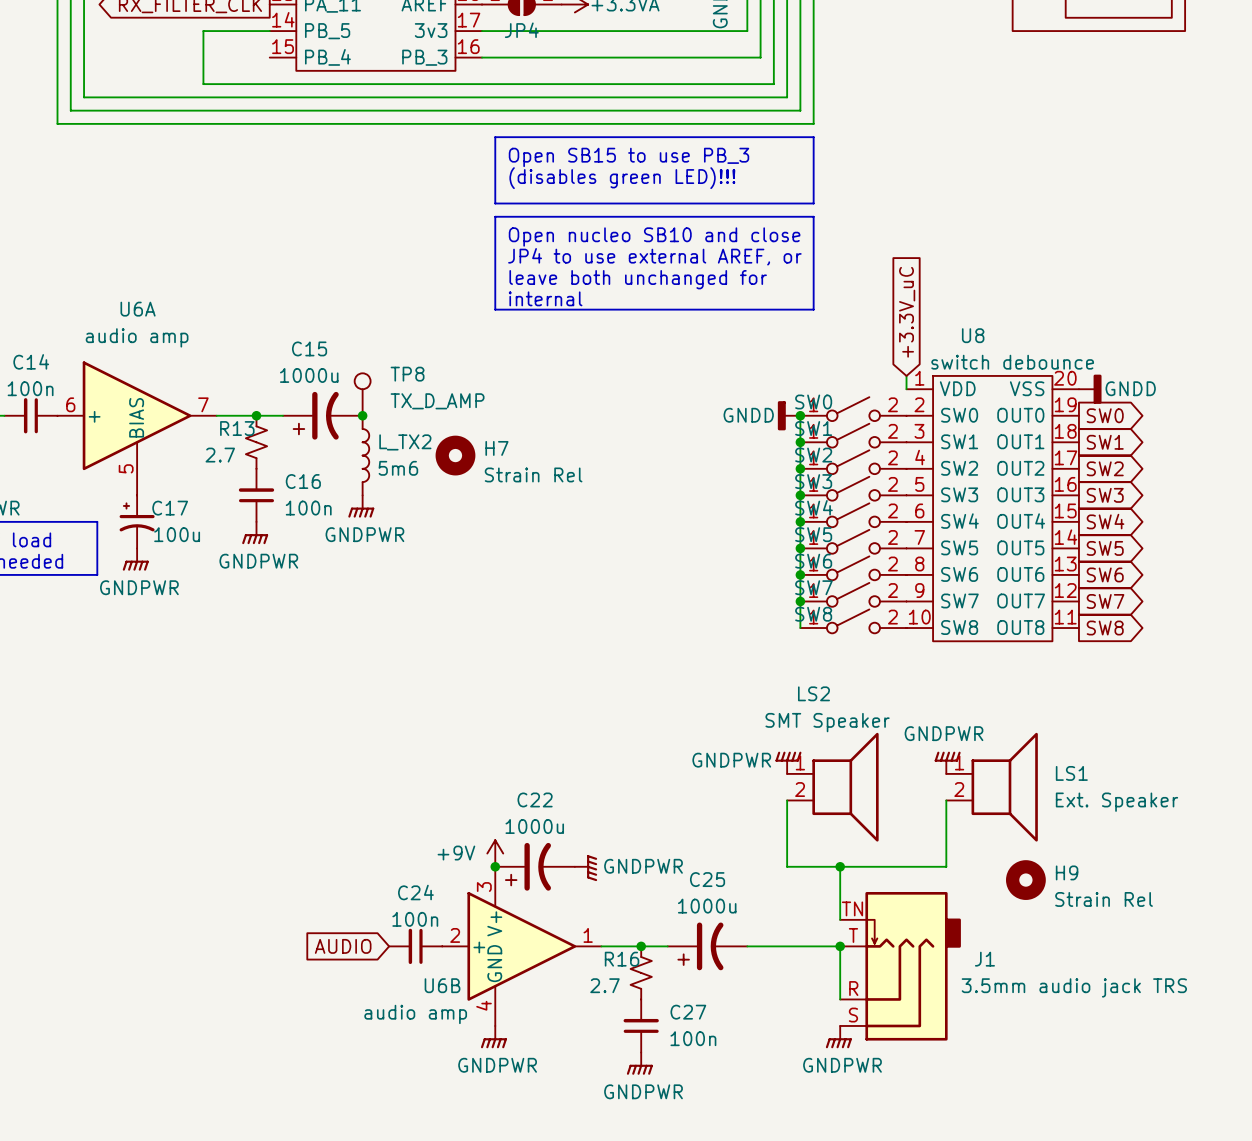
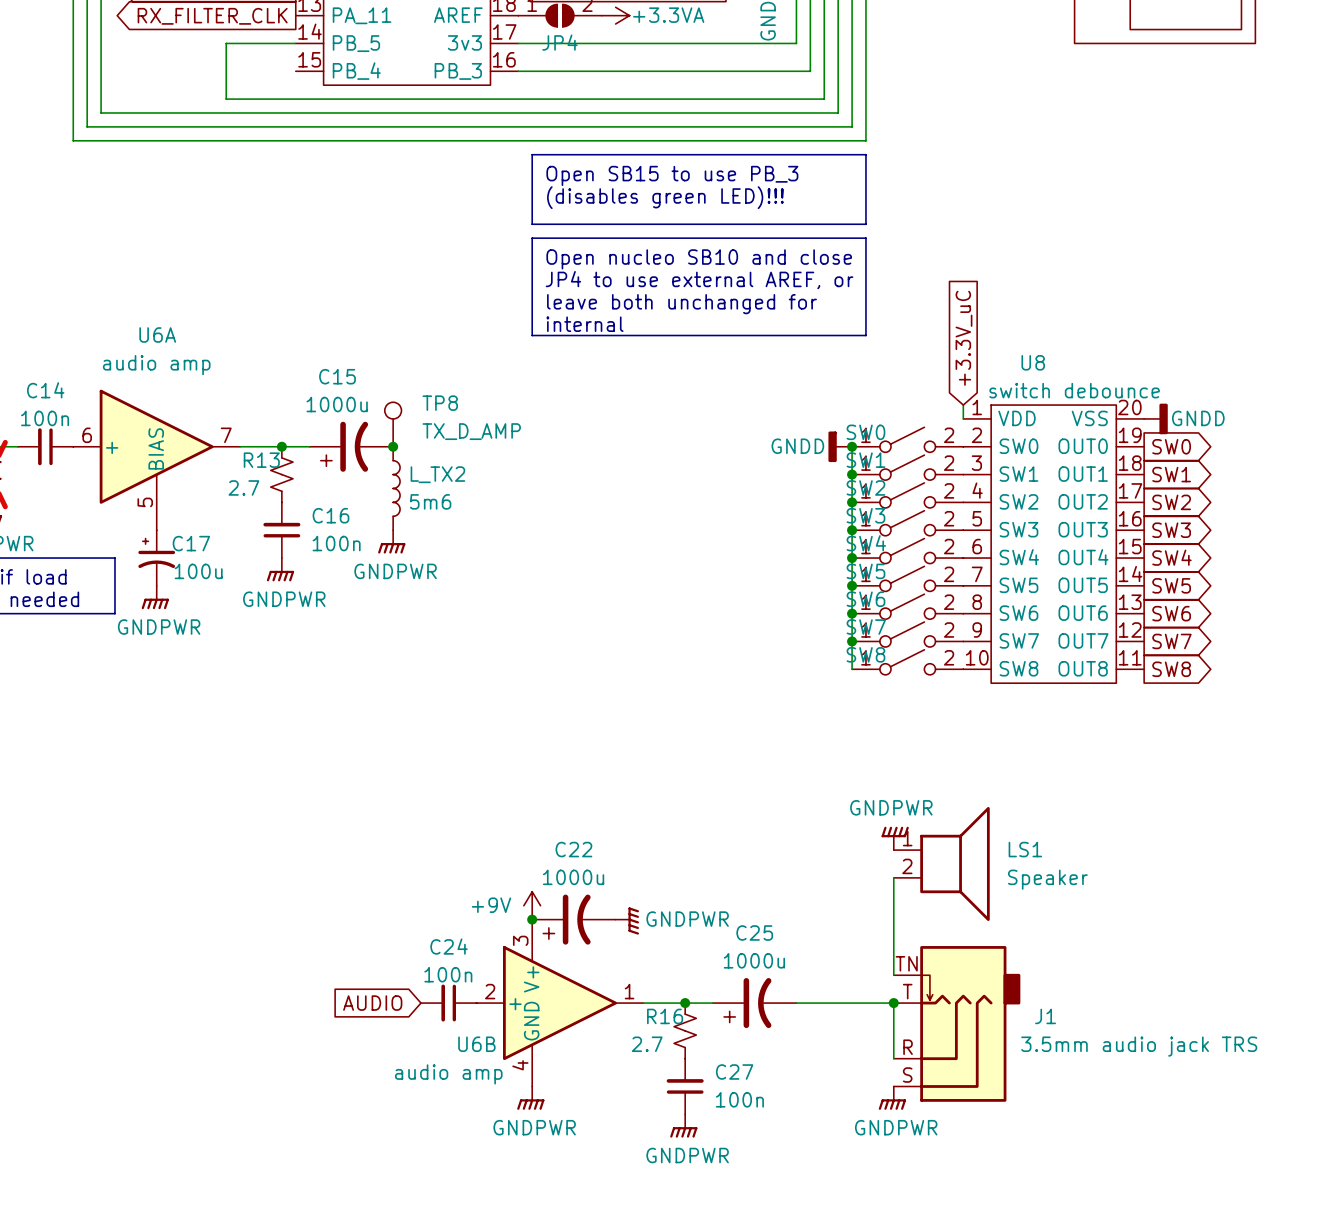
H7: Strain Rel (455, 455) -> none
power symbol: GNDPWR (788, 762) -> none
power symbol: GNDPWR (947, 762) -> none
LS2: SMT Speaker (832, 787) -> none
LS1 position: (992, 787) -> (941, 863)
power symbol: none -> GNDPWR (895, 838)
wire: (787, 800) (787, 866) (946, 866) (946, 800) -> none
LS1 value: Ext. Speaker (1116, 802) -> Speaker (1047, 879)
wire: none -> (893, 877) (893, 919)
junction: (840, 866) -> none
H9: Strain Rel (1025, 880) -> none

